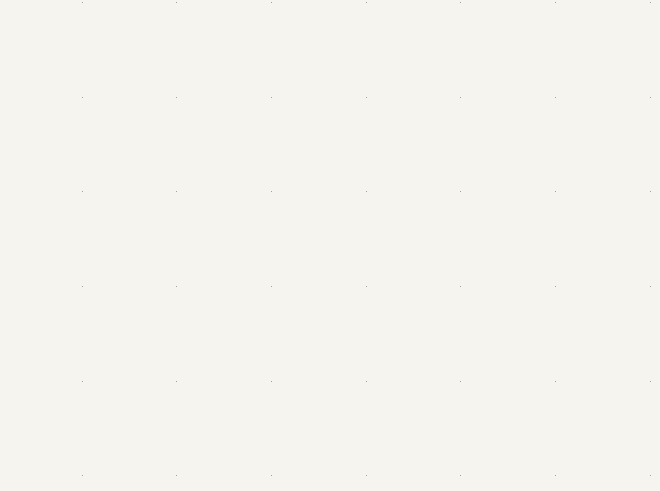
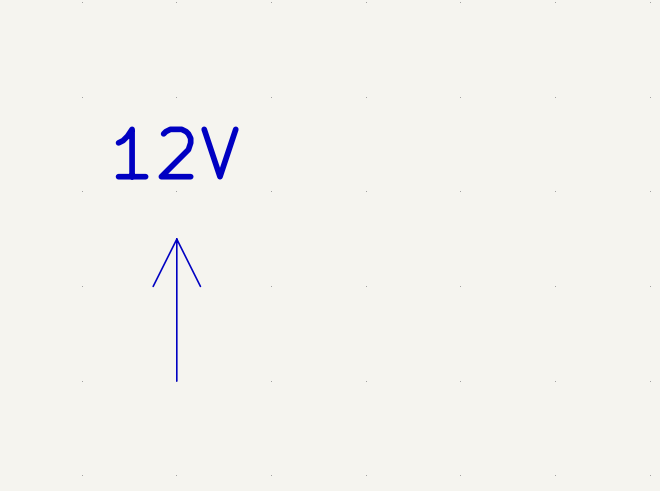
text: none -> 12V (177, 153)
line: none -> (176, 239) (200, 286)
line: none -> (176, 239) (153, 286)
line: none -> (176, 239) (176, 381)

